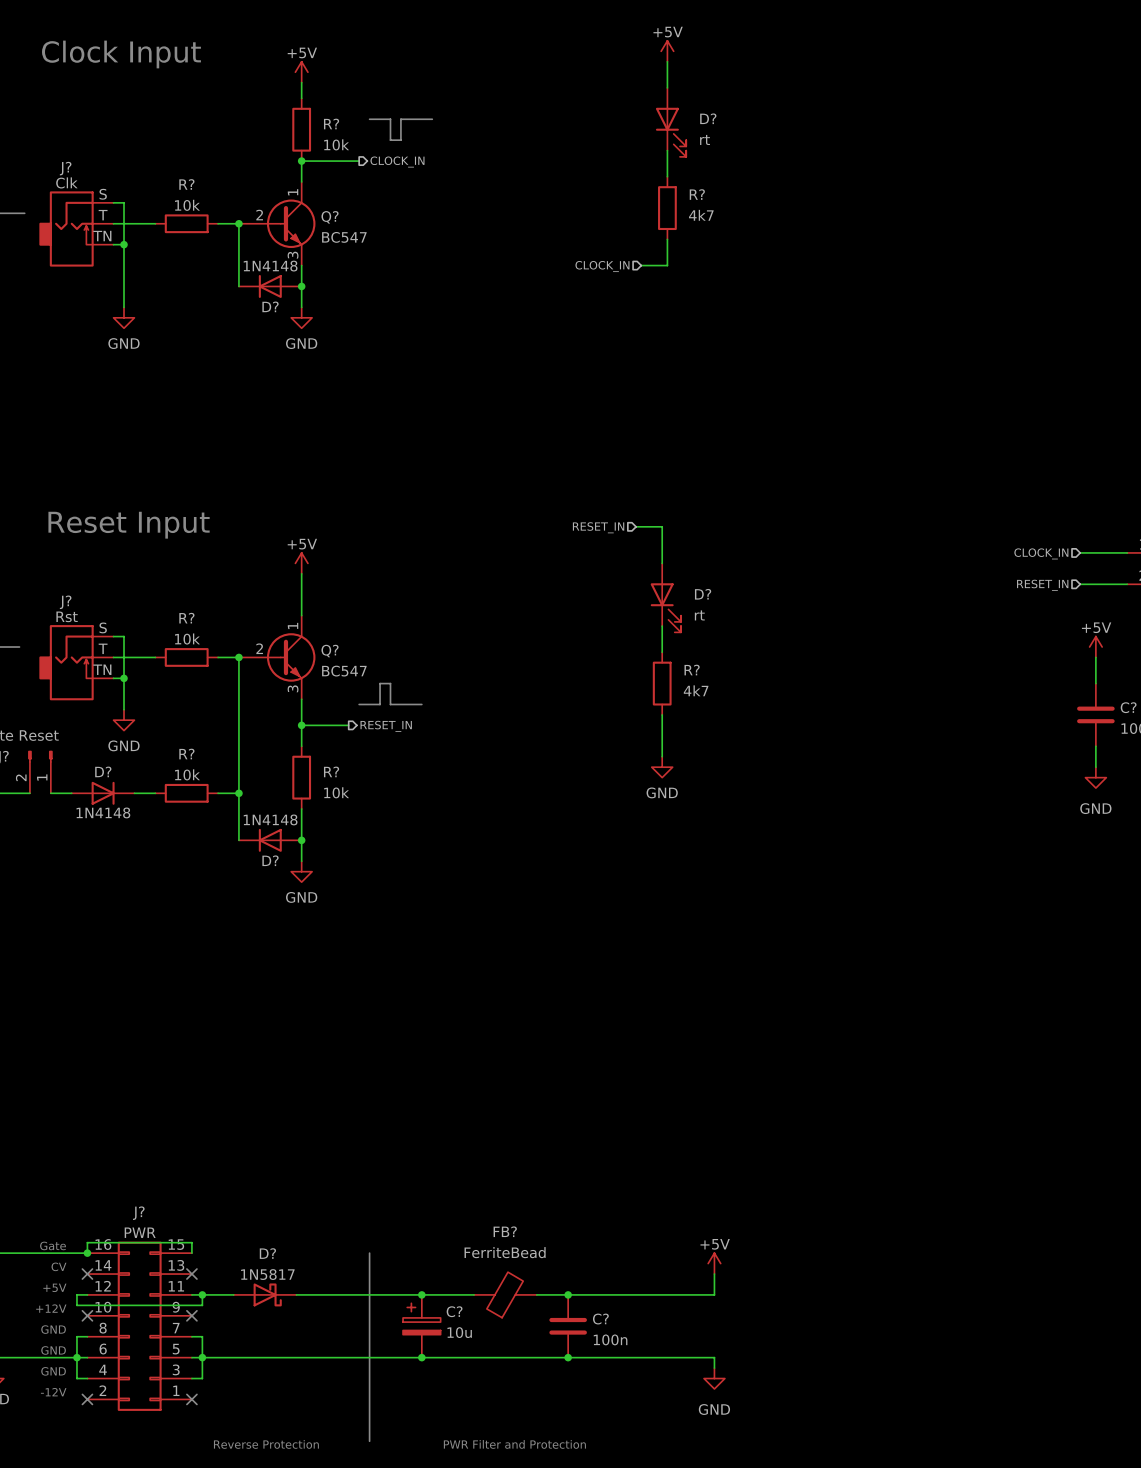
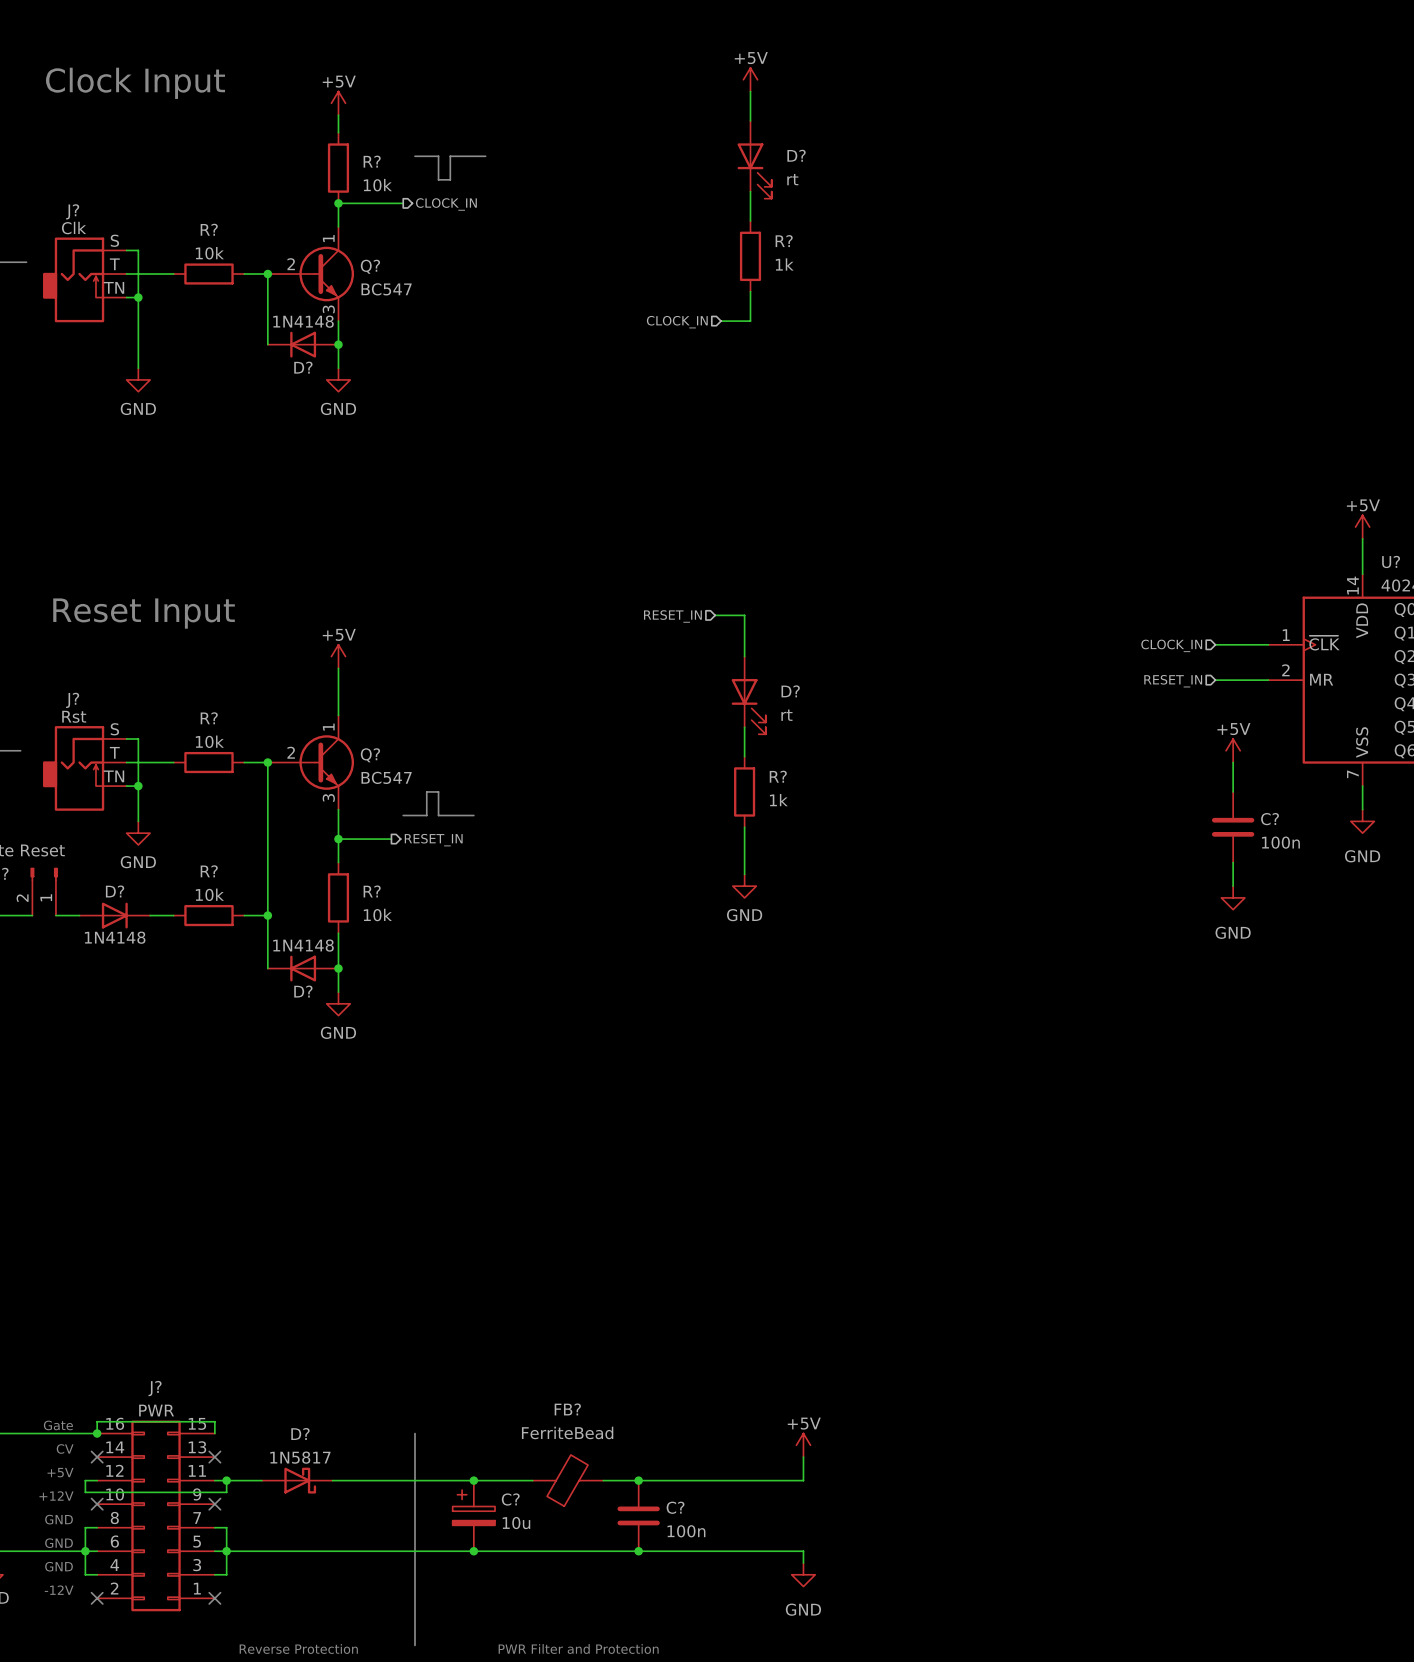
R? value: 4k7 (701, 215) -> 1k (784, 264)
R? value: 4k7 (696, 690) -> 1k (778, 800)

